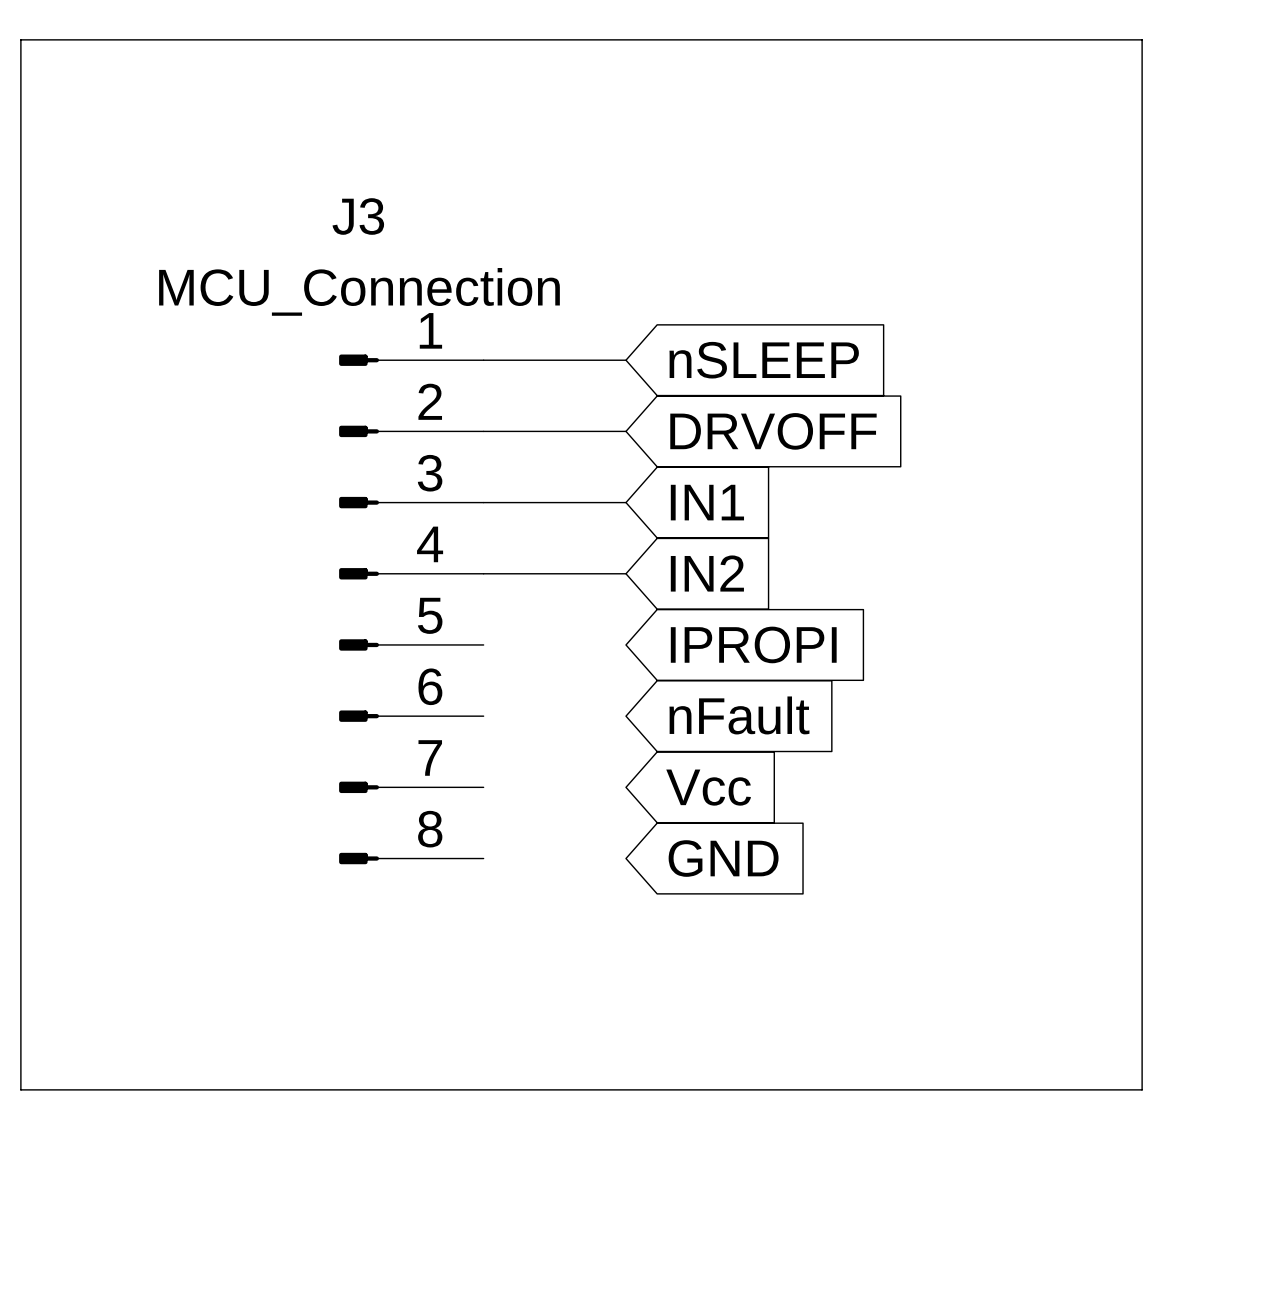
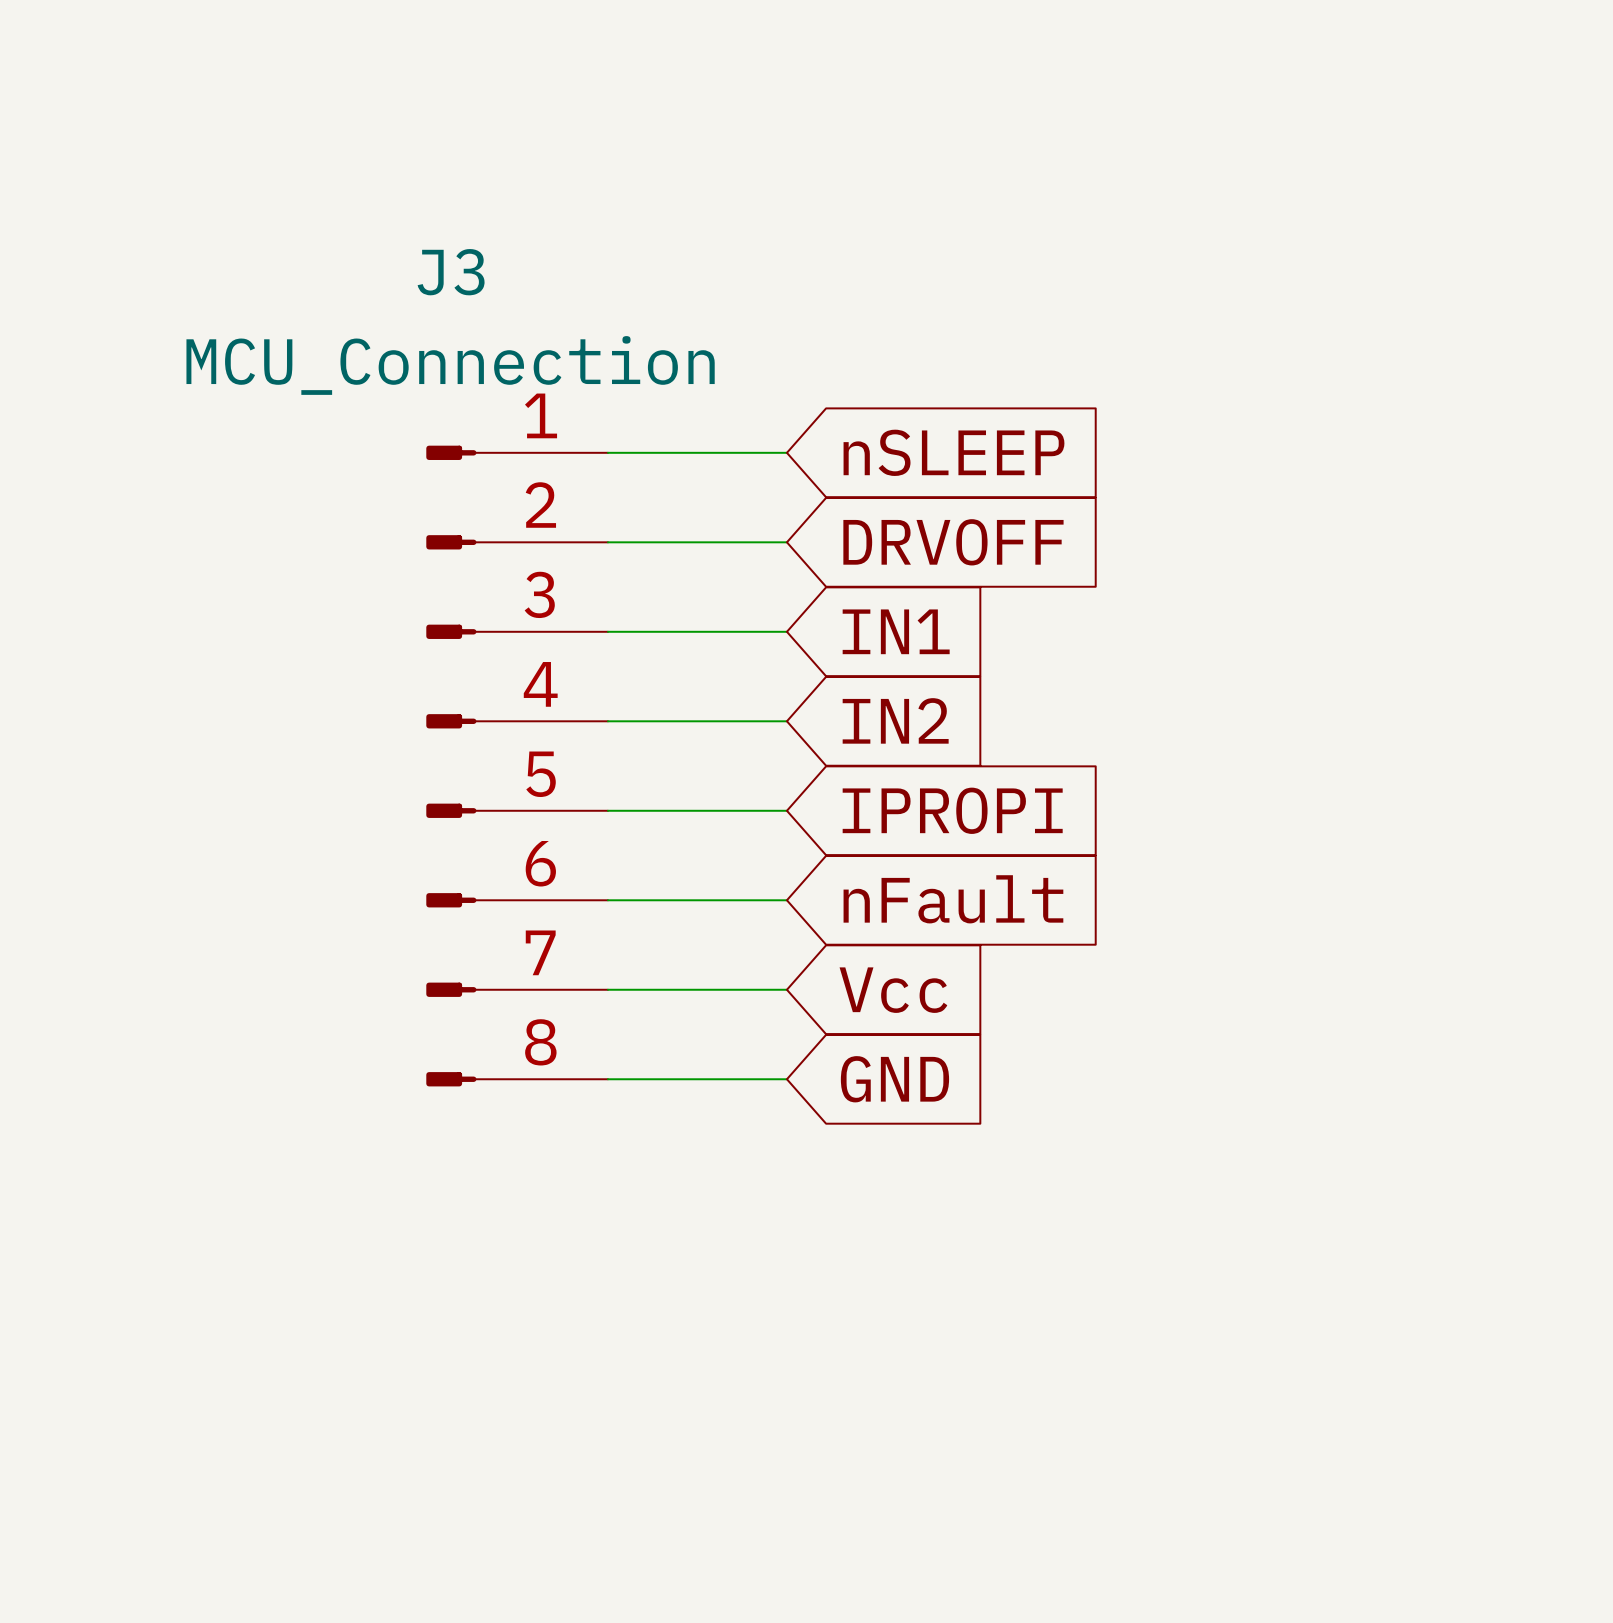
line: (20, 39) (1142, 39) (1142, 1089) (20, 1089) (20, 39) -> none
wire: none -> (607, 810) (786, 810)
wire: none -> (607, 900) (786, 900)
wire: none -> (607, 989) (786, 989)
wire: none -> (607, 1079) (786, 1079)

